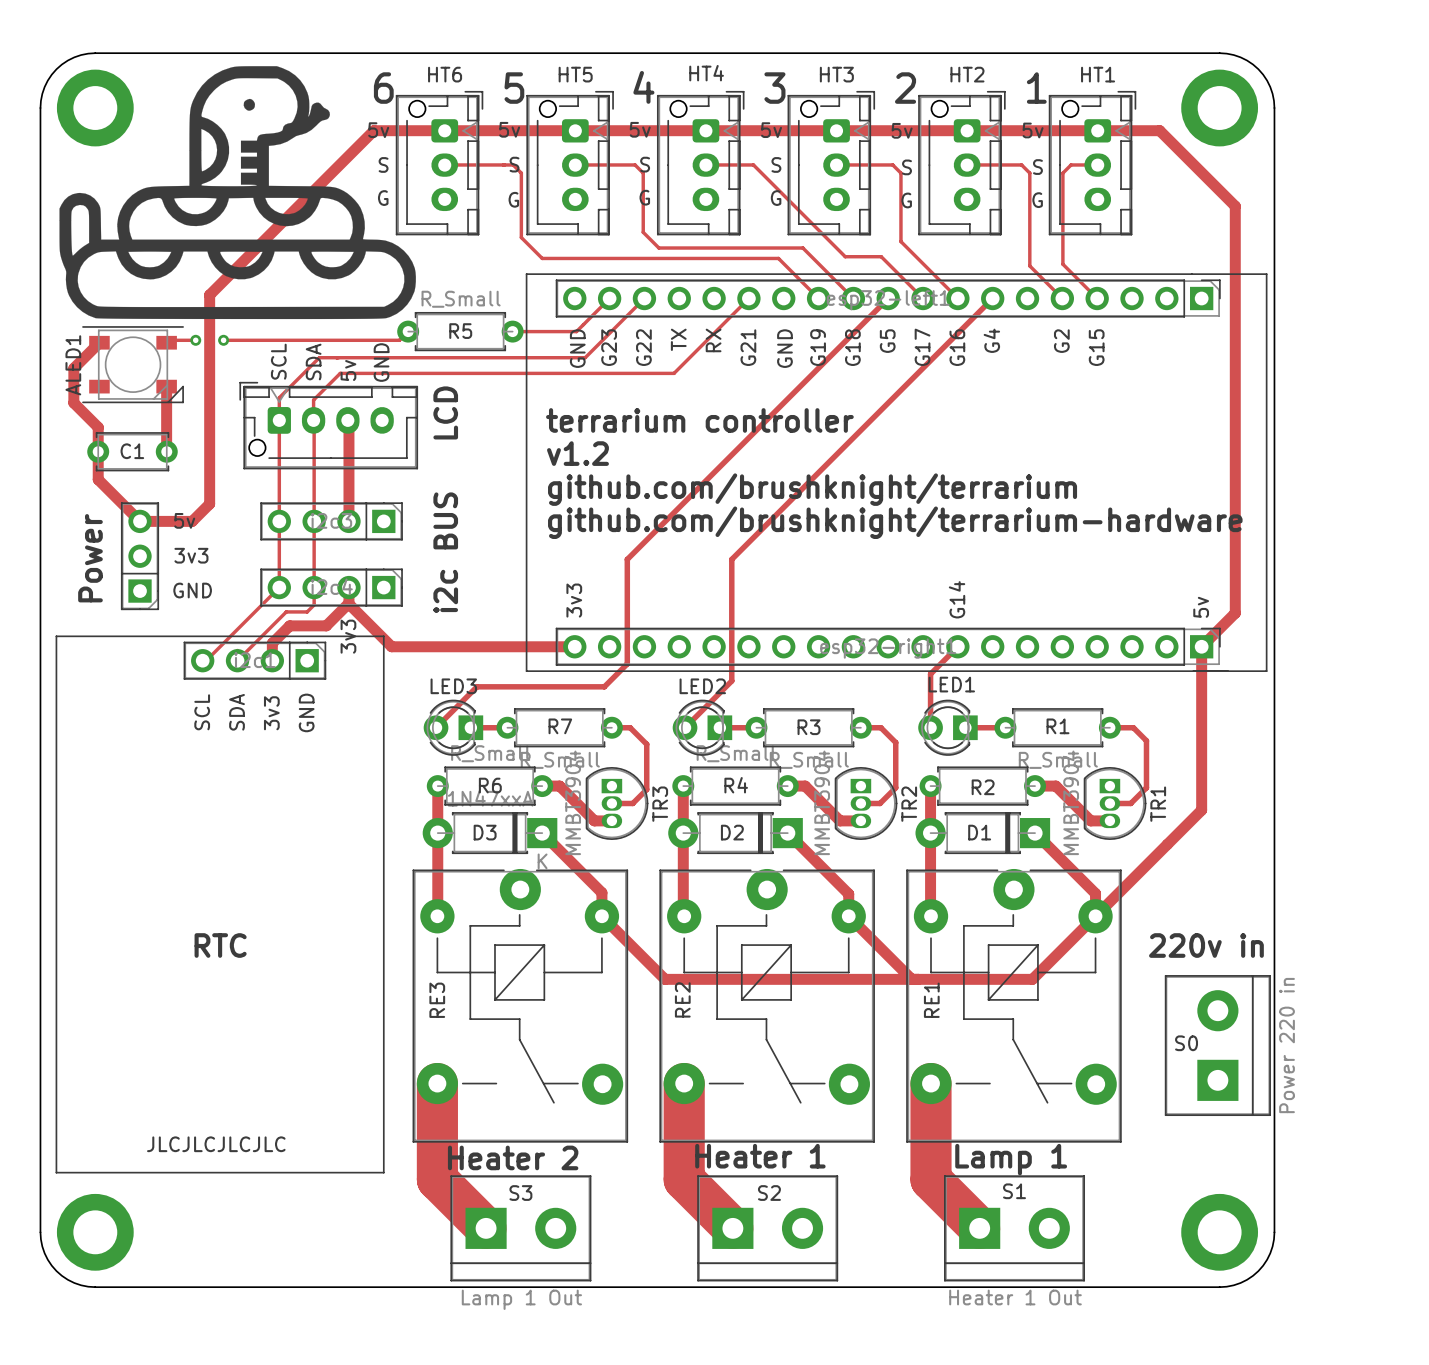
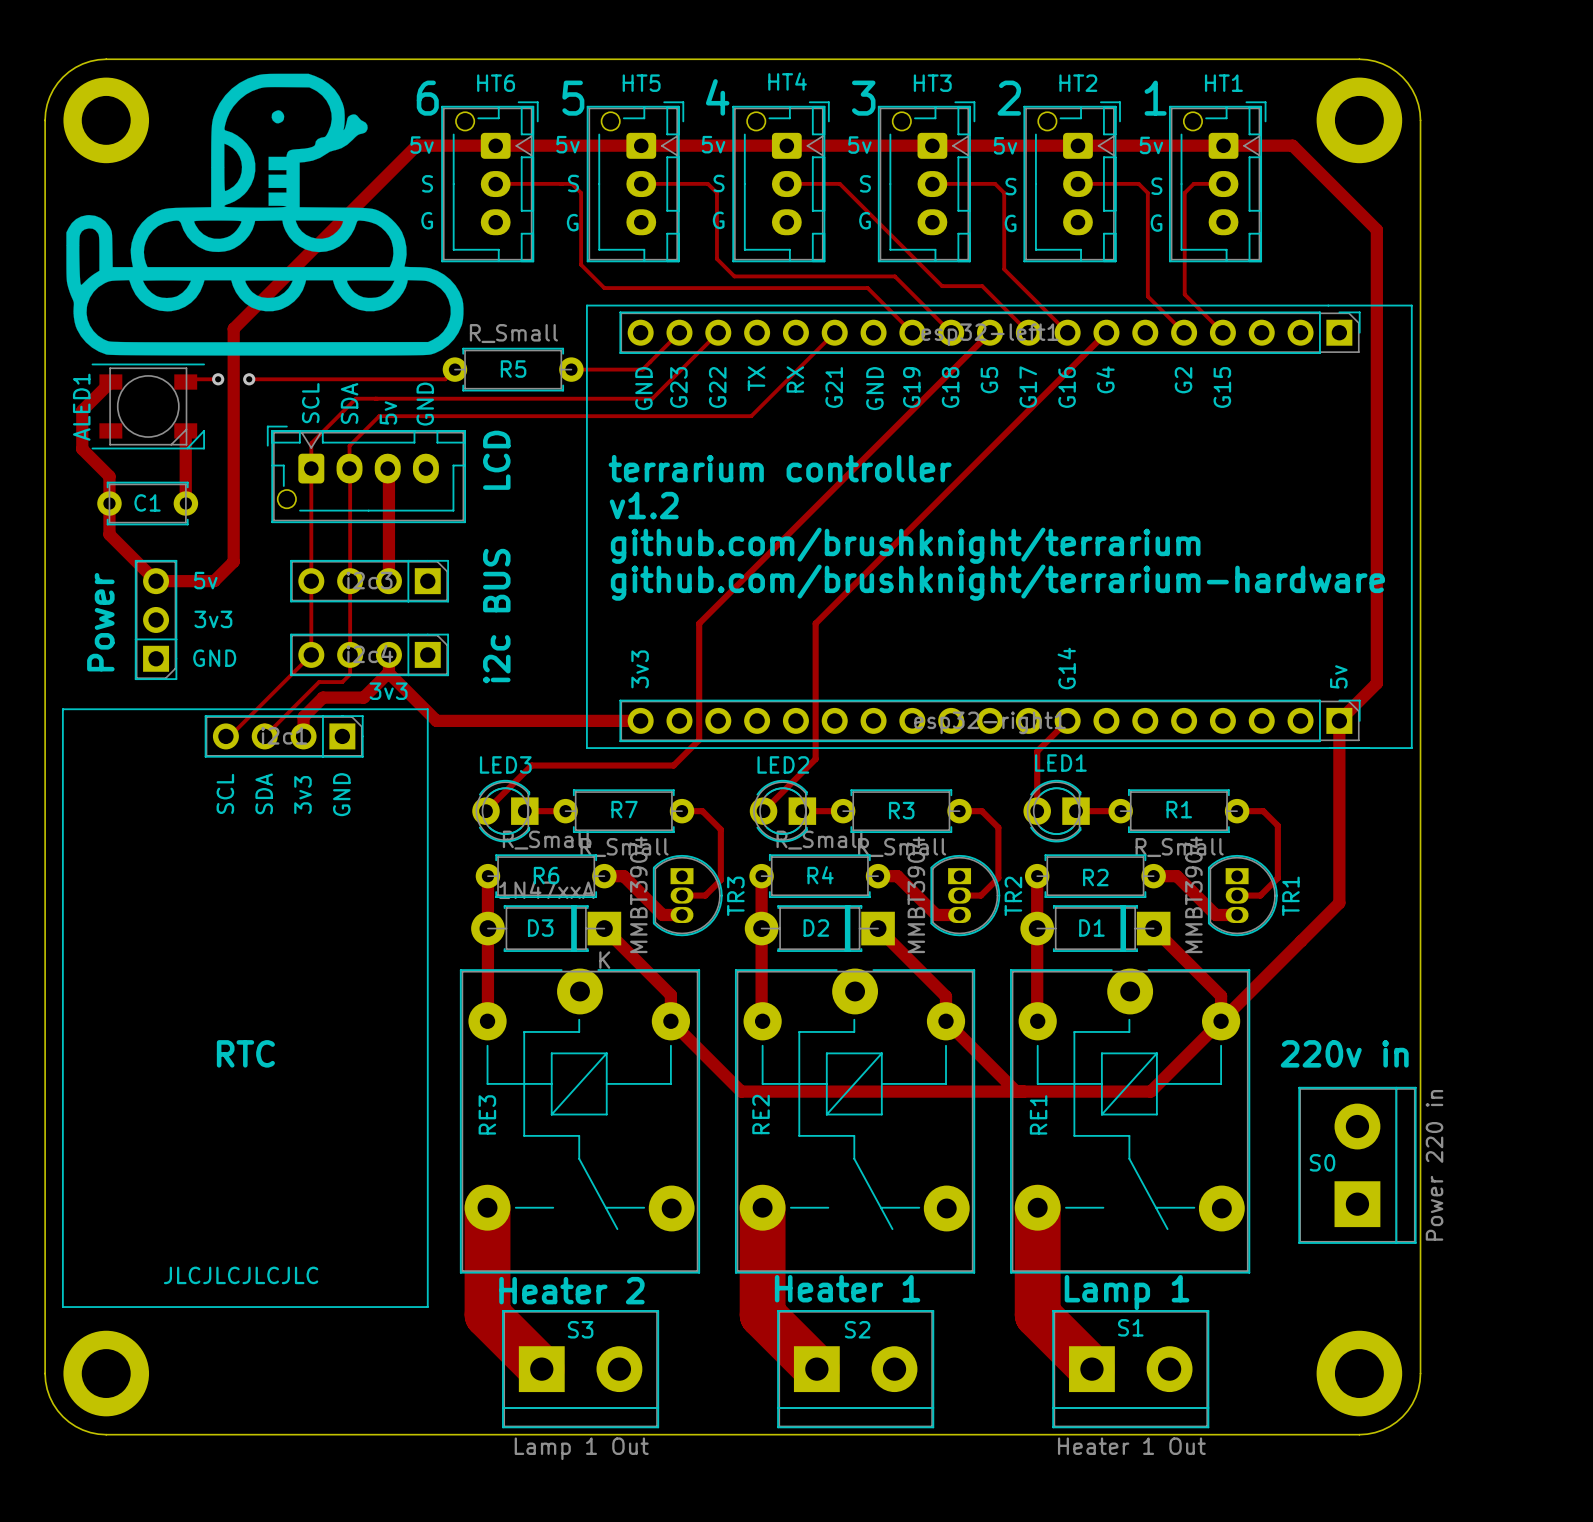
text rotation: 0° (348, 636) -> 90° clockwise (388, 691)

